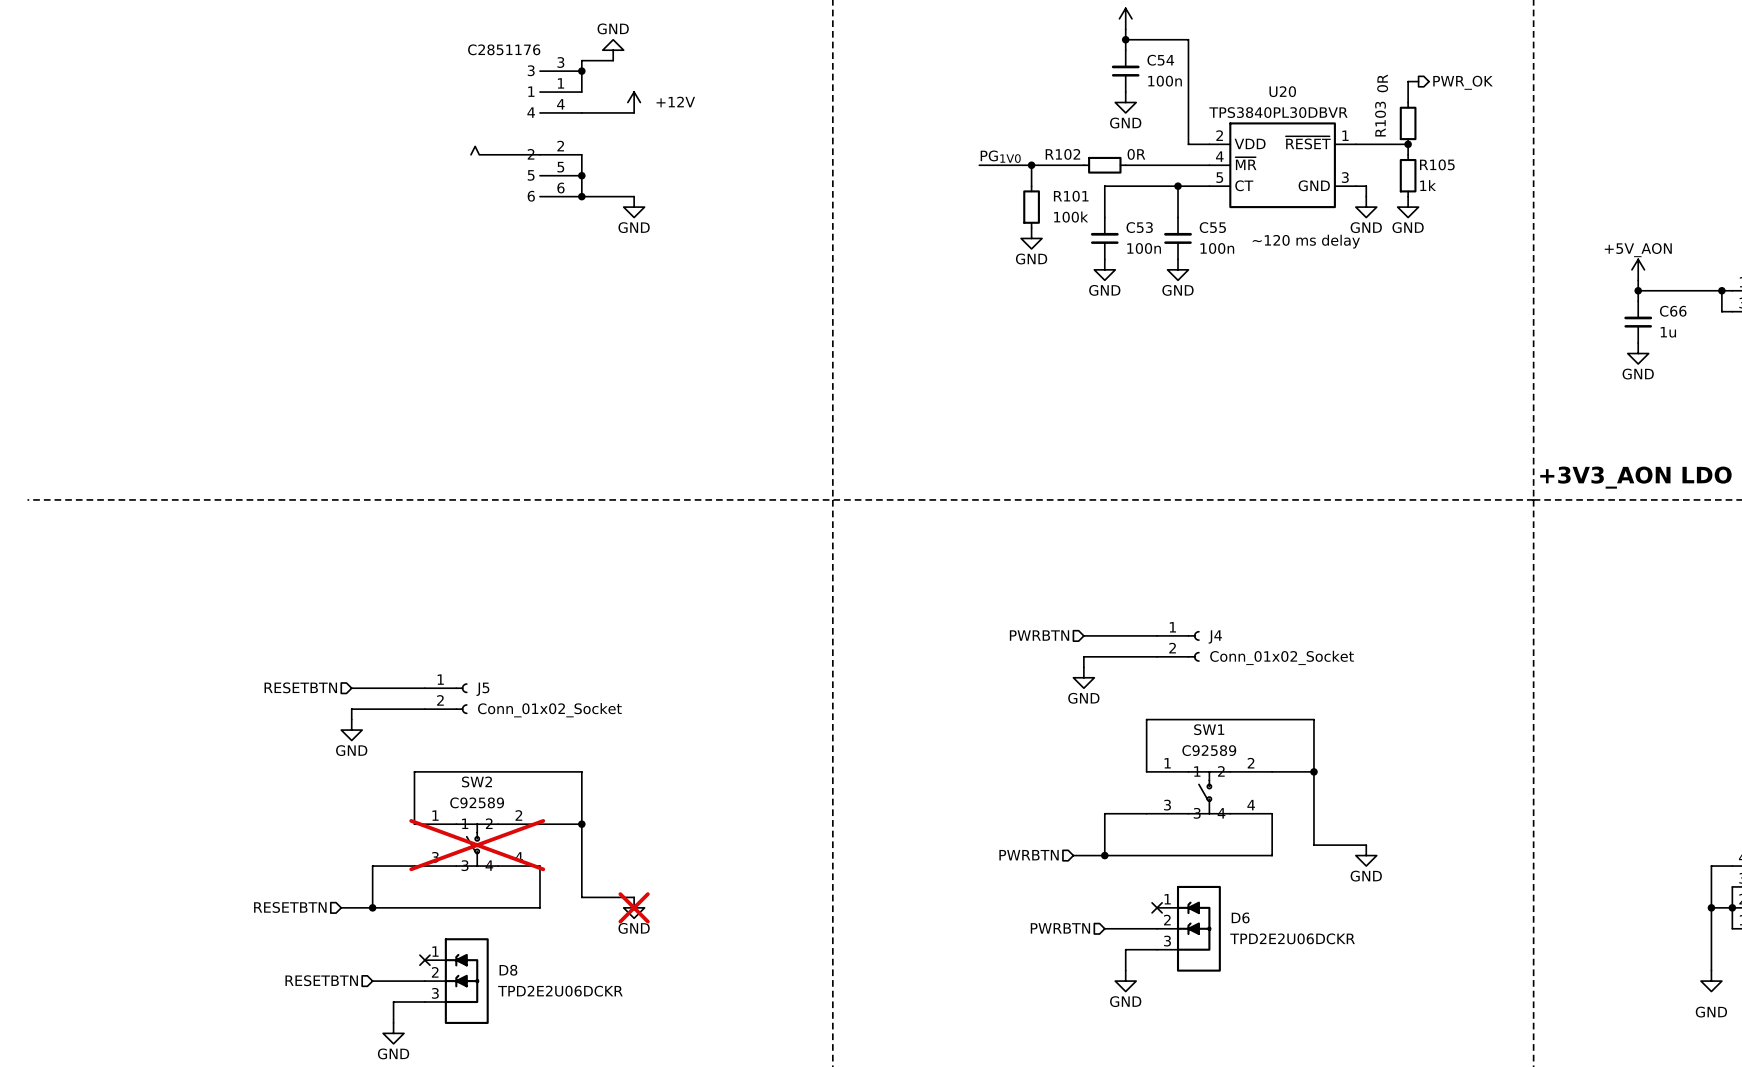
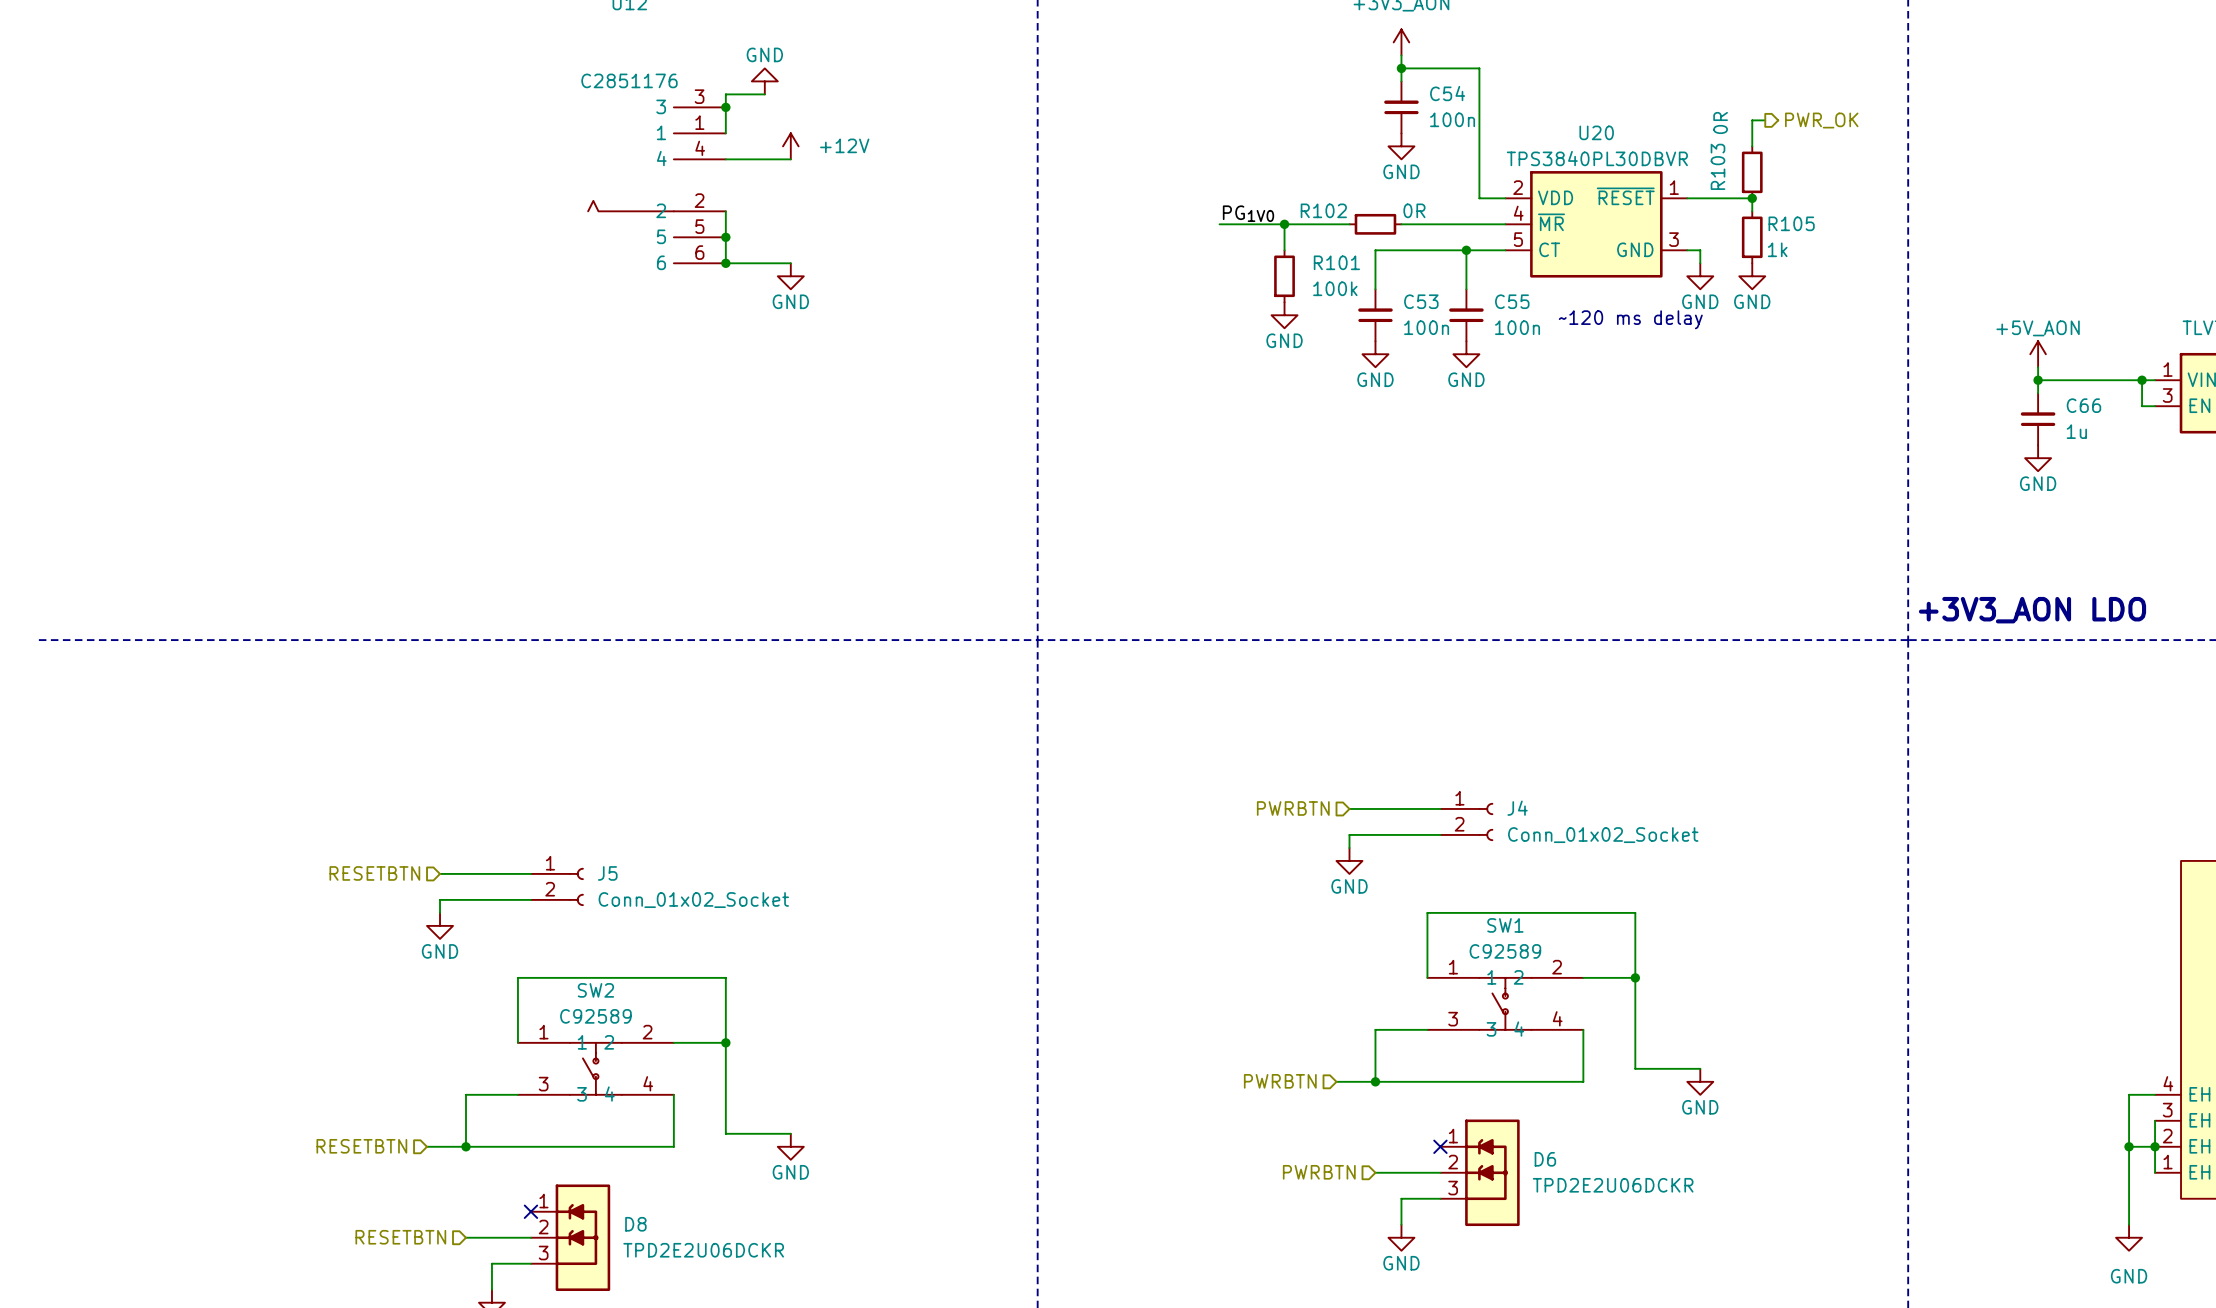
SW2 do-not-place cross: (477, 845) -> none
power symbol do-not-place cross: (634, 907) -> none

